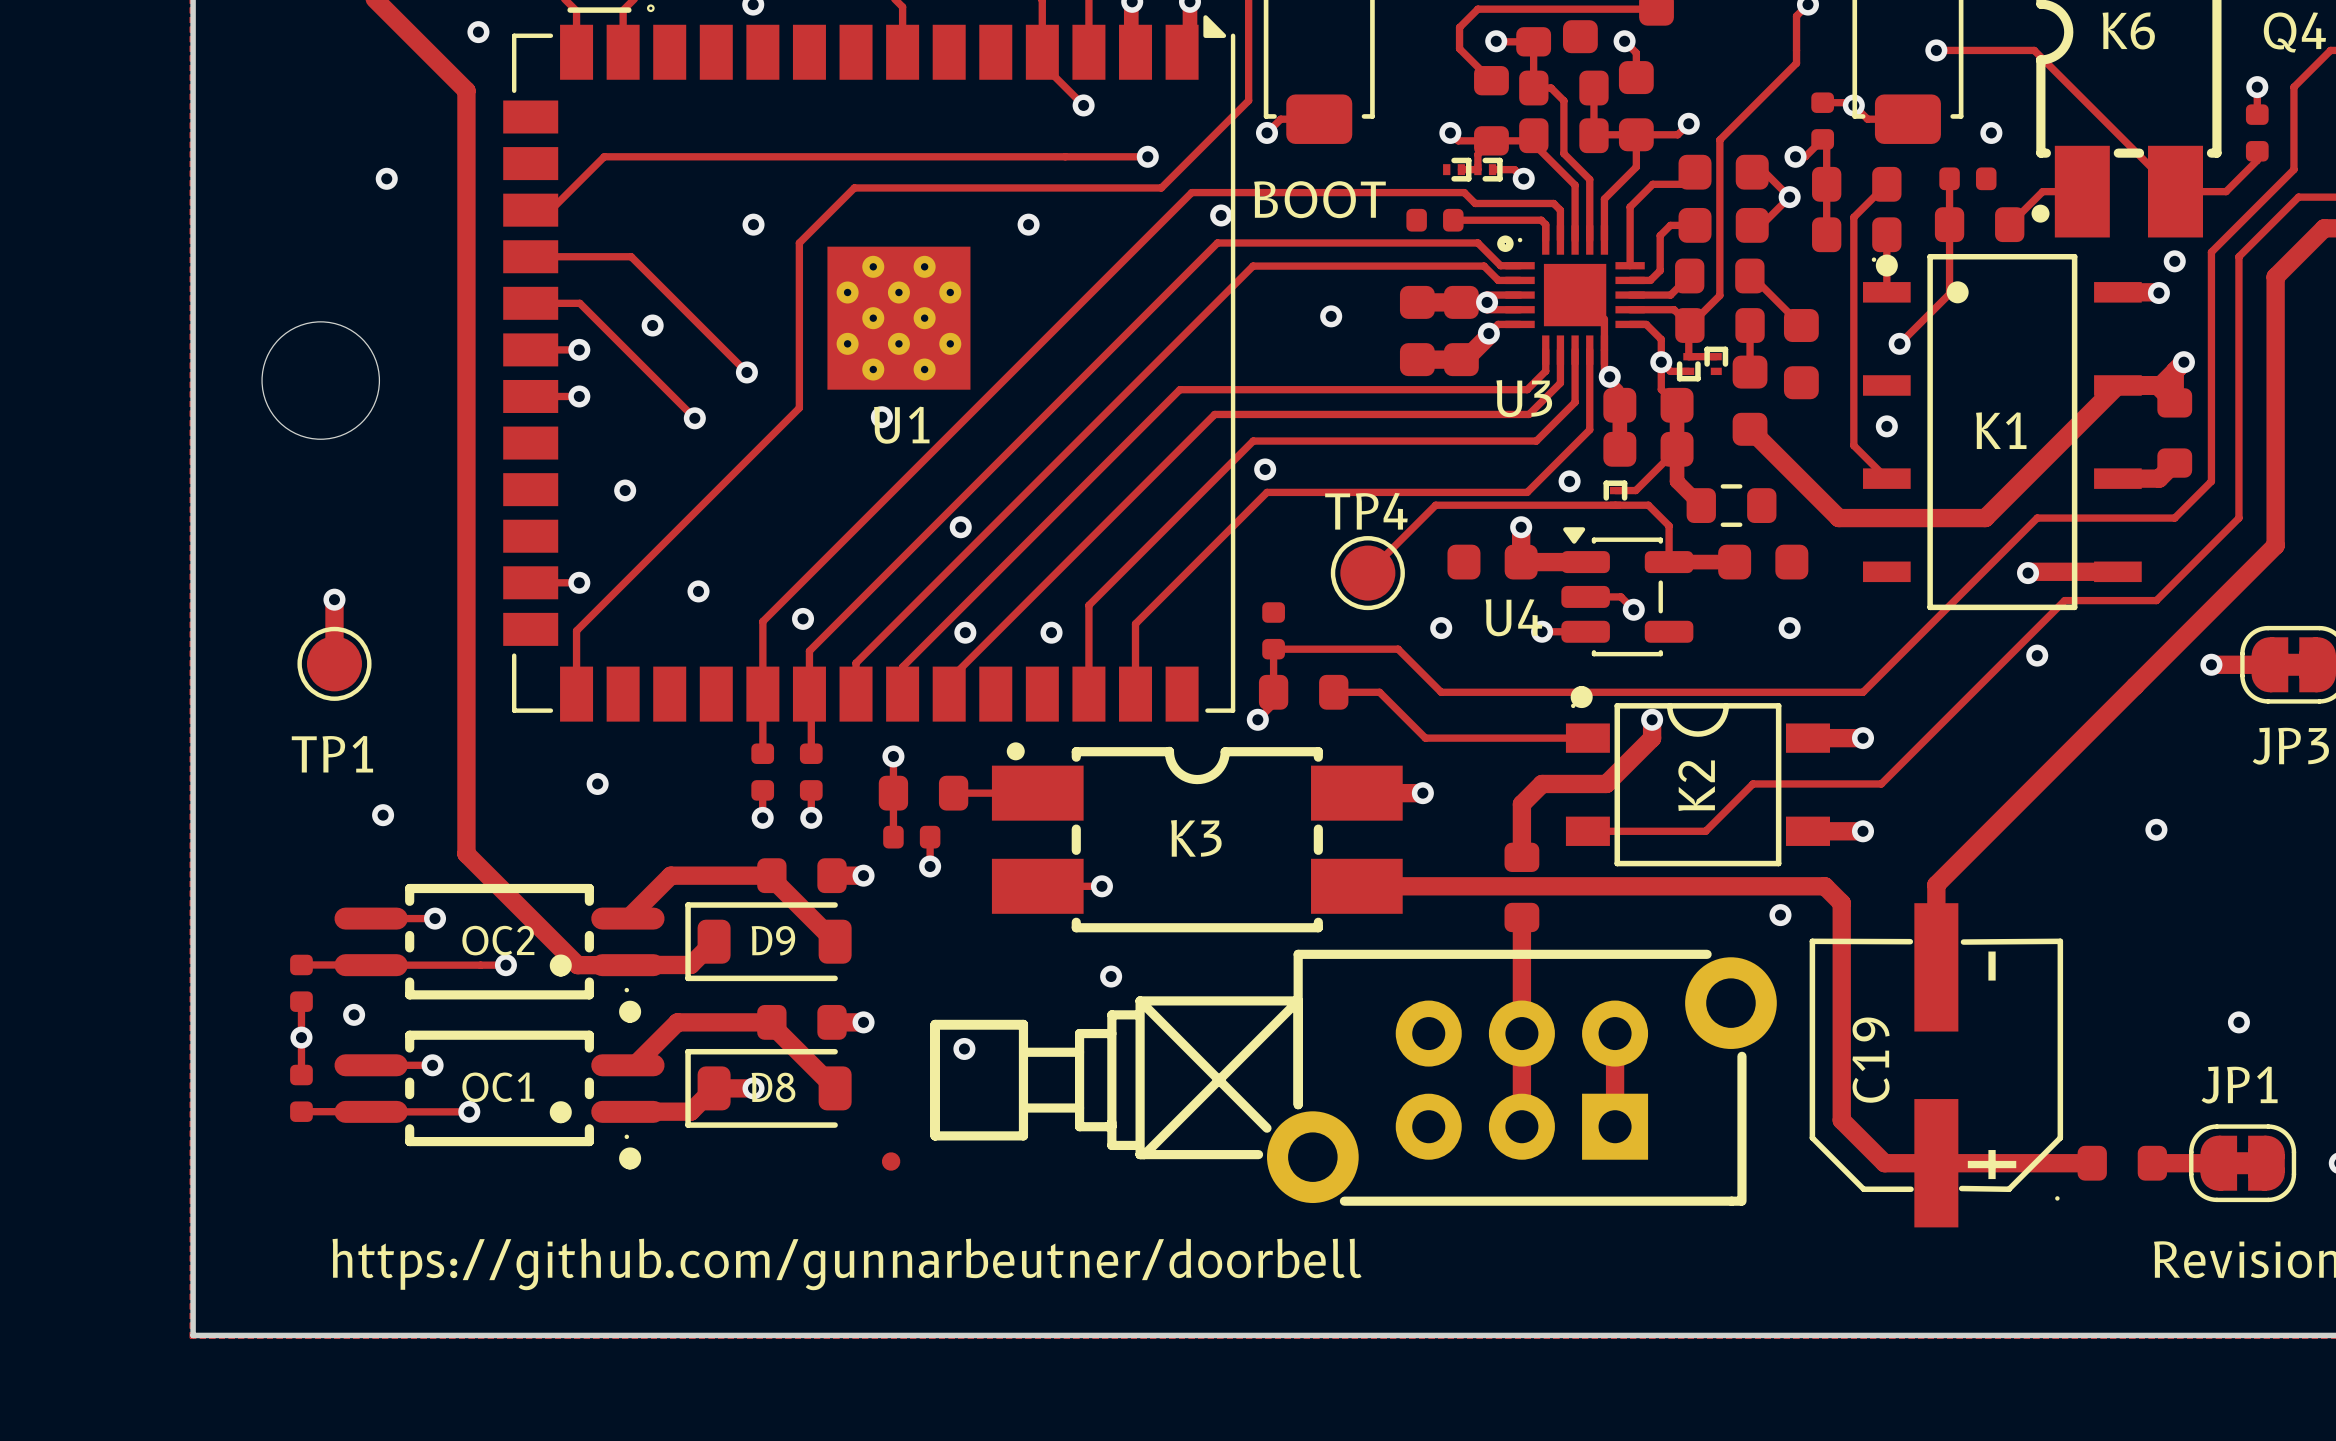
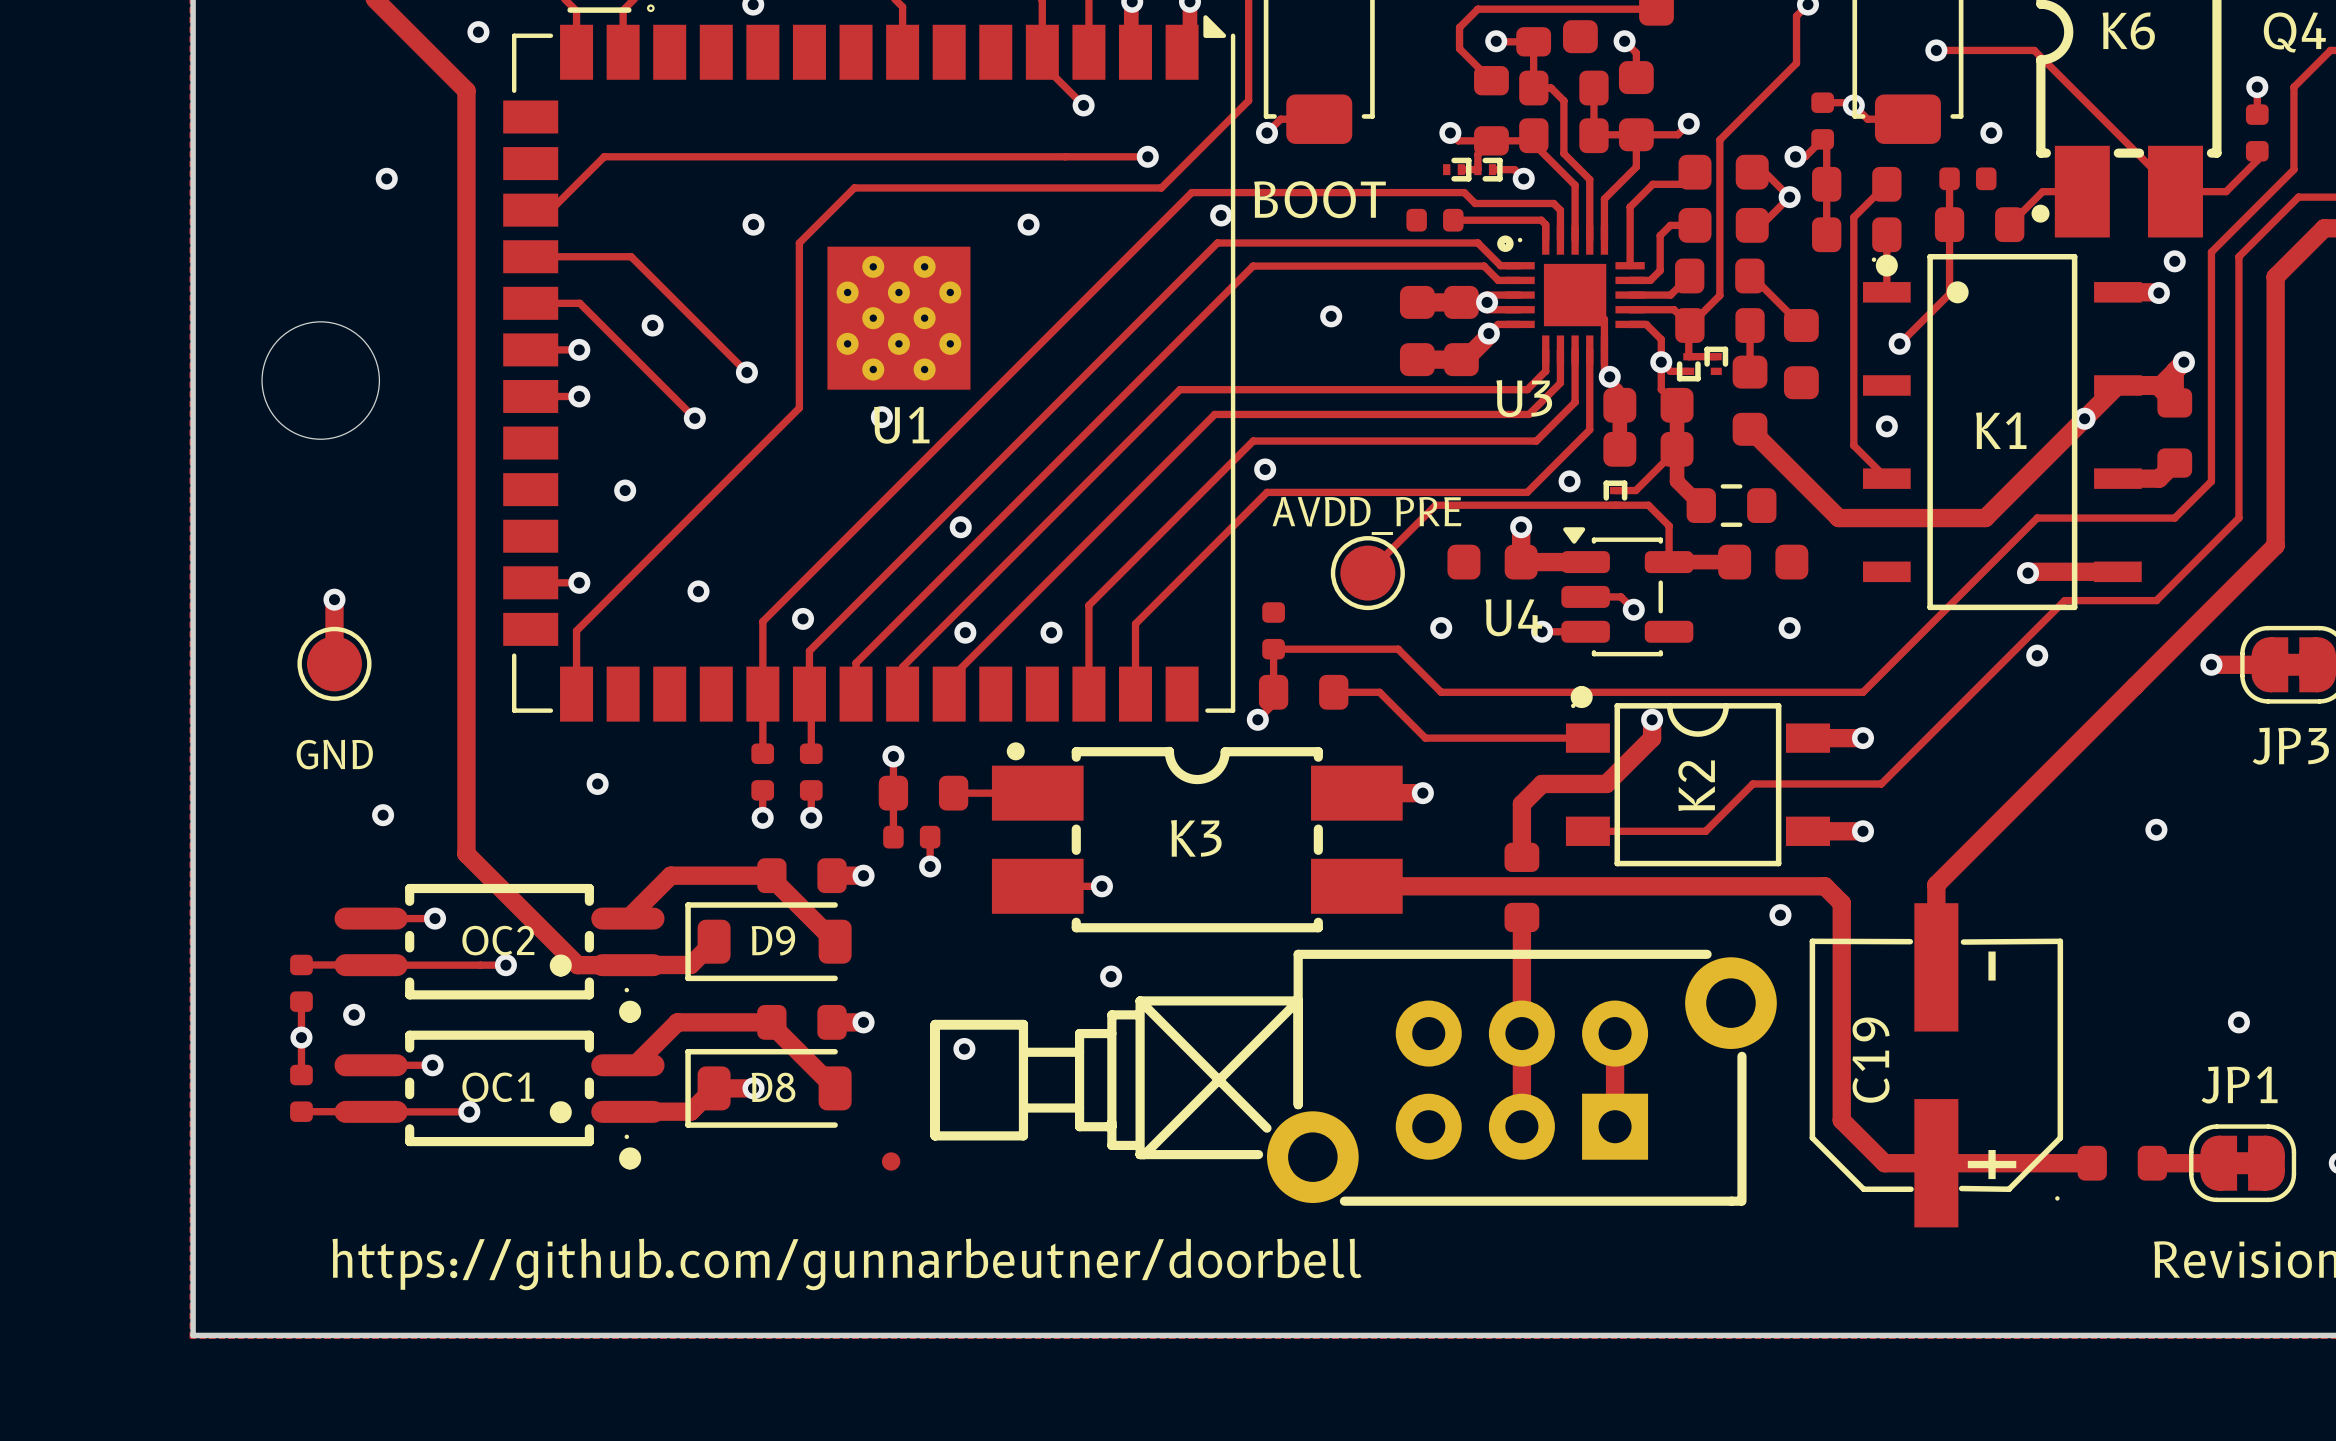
via: none -> (2084, 418)
TP4 name: TP4 (1366, 511) -> none
TP4 text: none -> AVDD_PRE (1366, 515)
TP1 name: TP1 (332, 754) -> none
TP1 text: none -> GND (334, 754)

